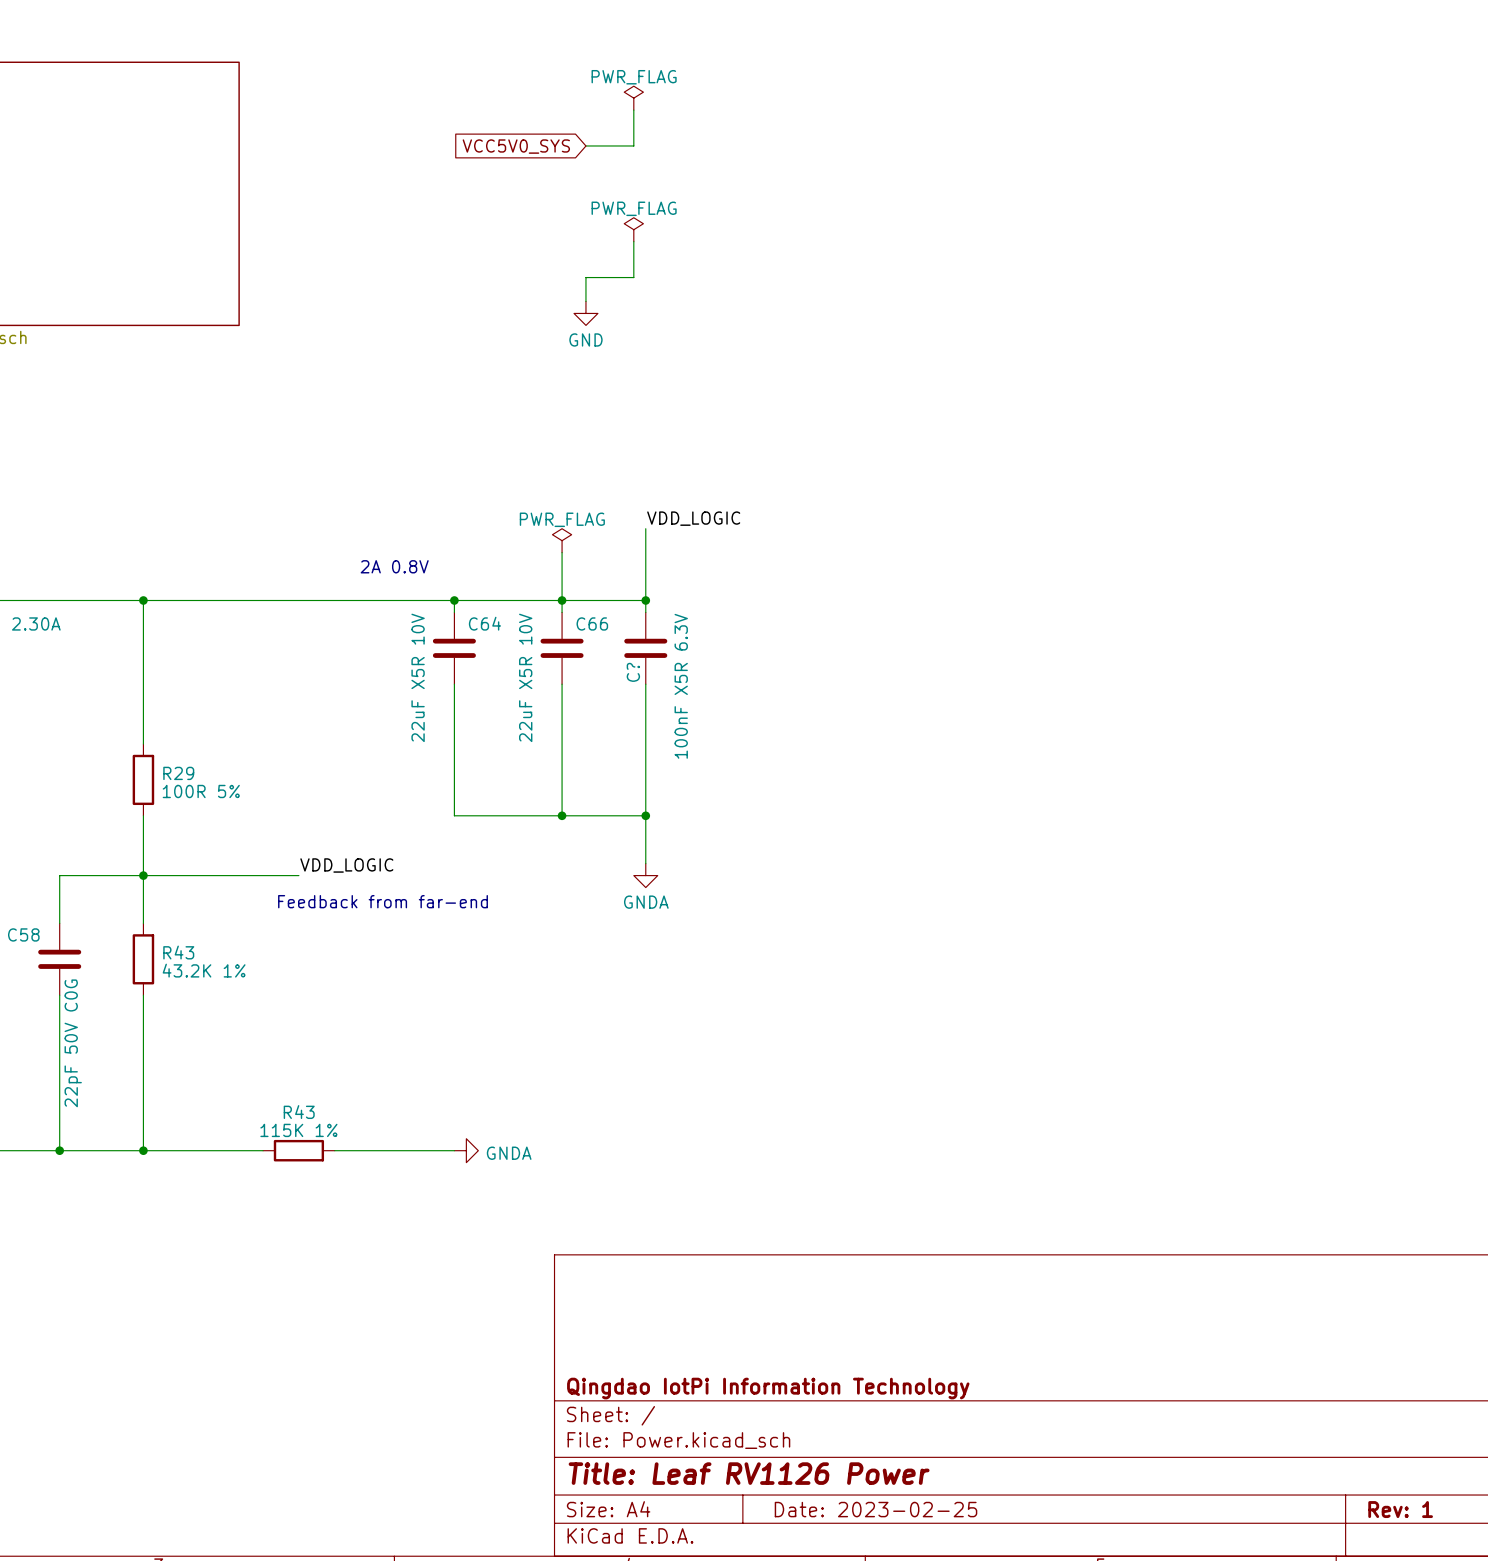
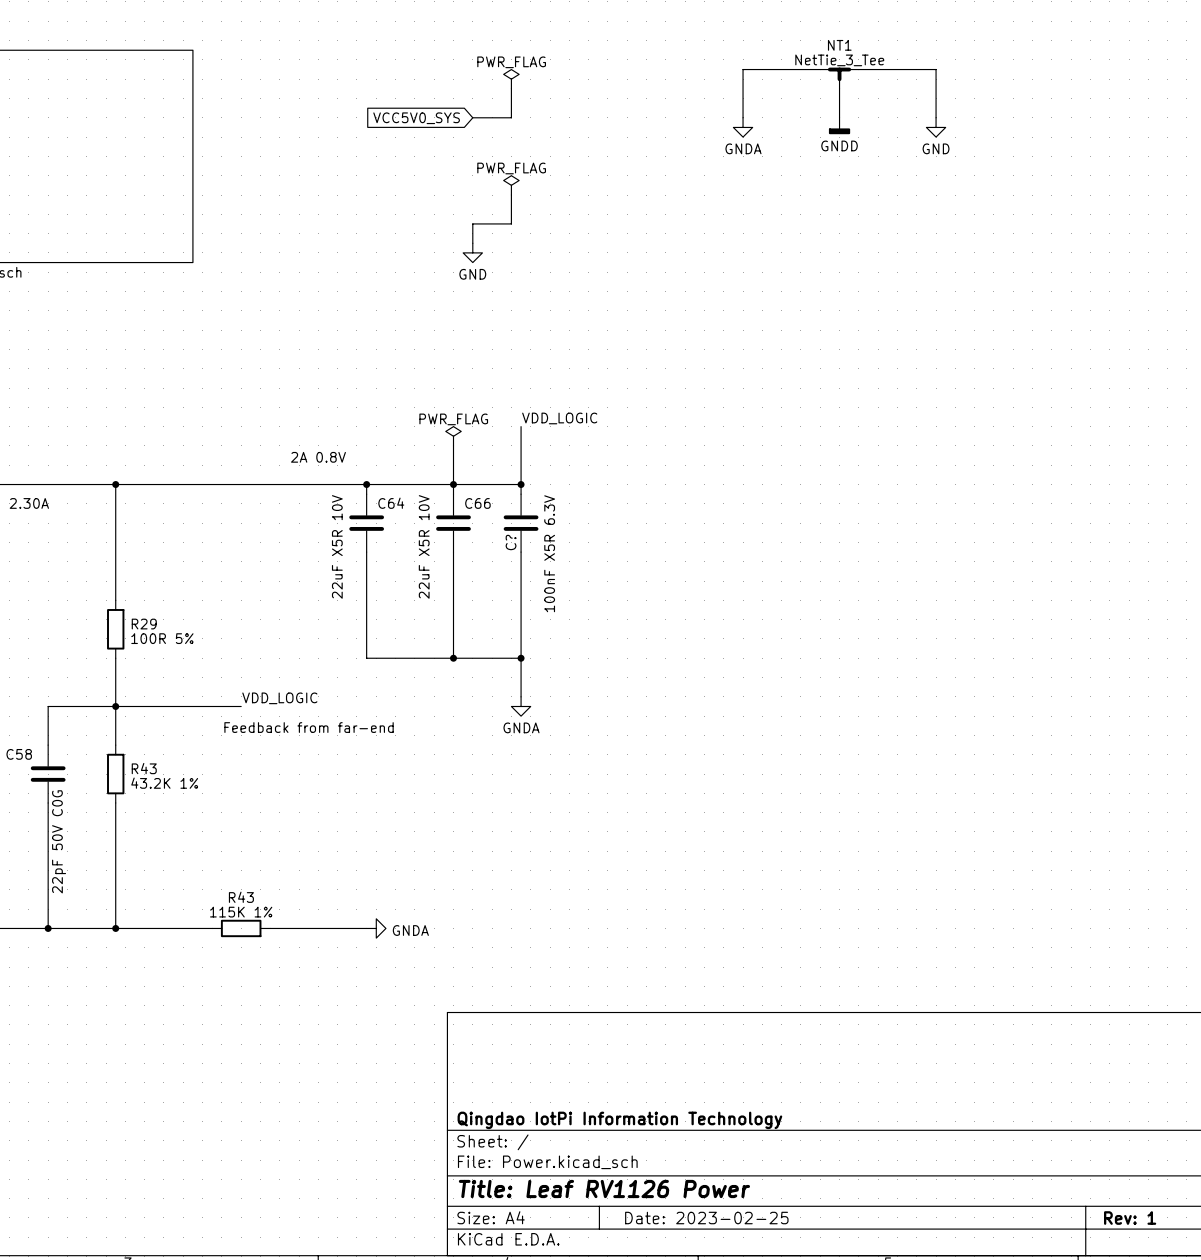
wire: none -> (820, 69) (743, 69) (743, 117)
wire: none -> (858, 69) (936, 69) (936, 117)
NT1: none -> NetTie_3_Tee (839, 78)
wire: none -> (839, 88) (839, 117)
power symbol: none -> GNDD (839, 125)
power symbol: none -> GNDA (743, 127)
power symbol: none -> GND (936, 127)

